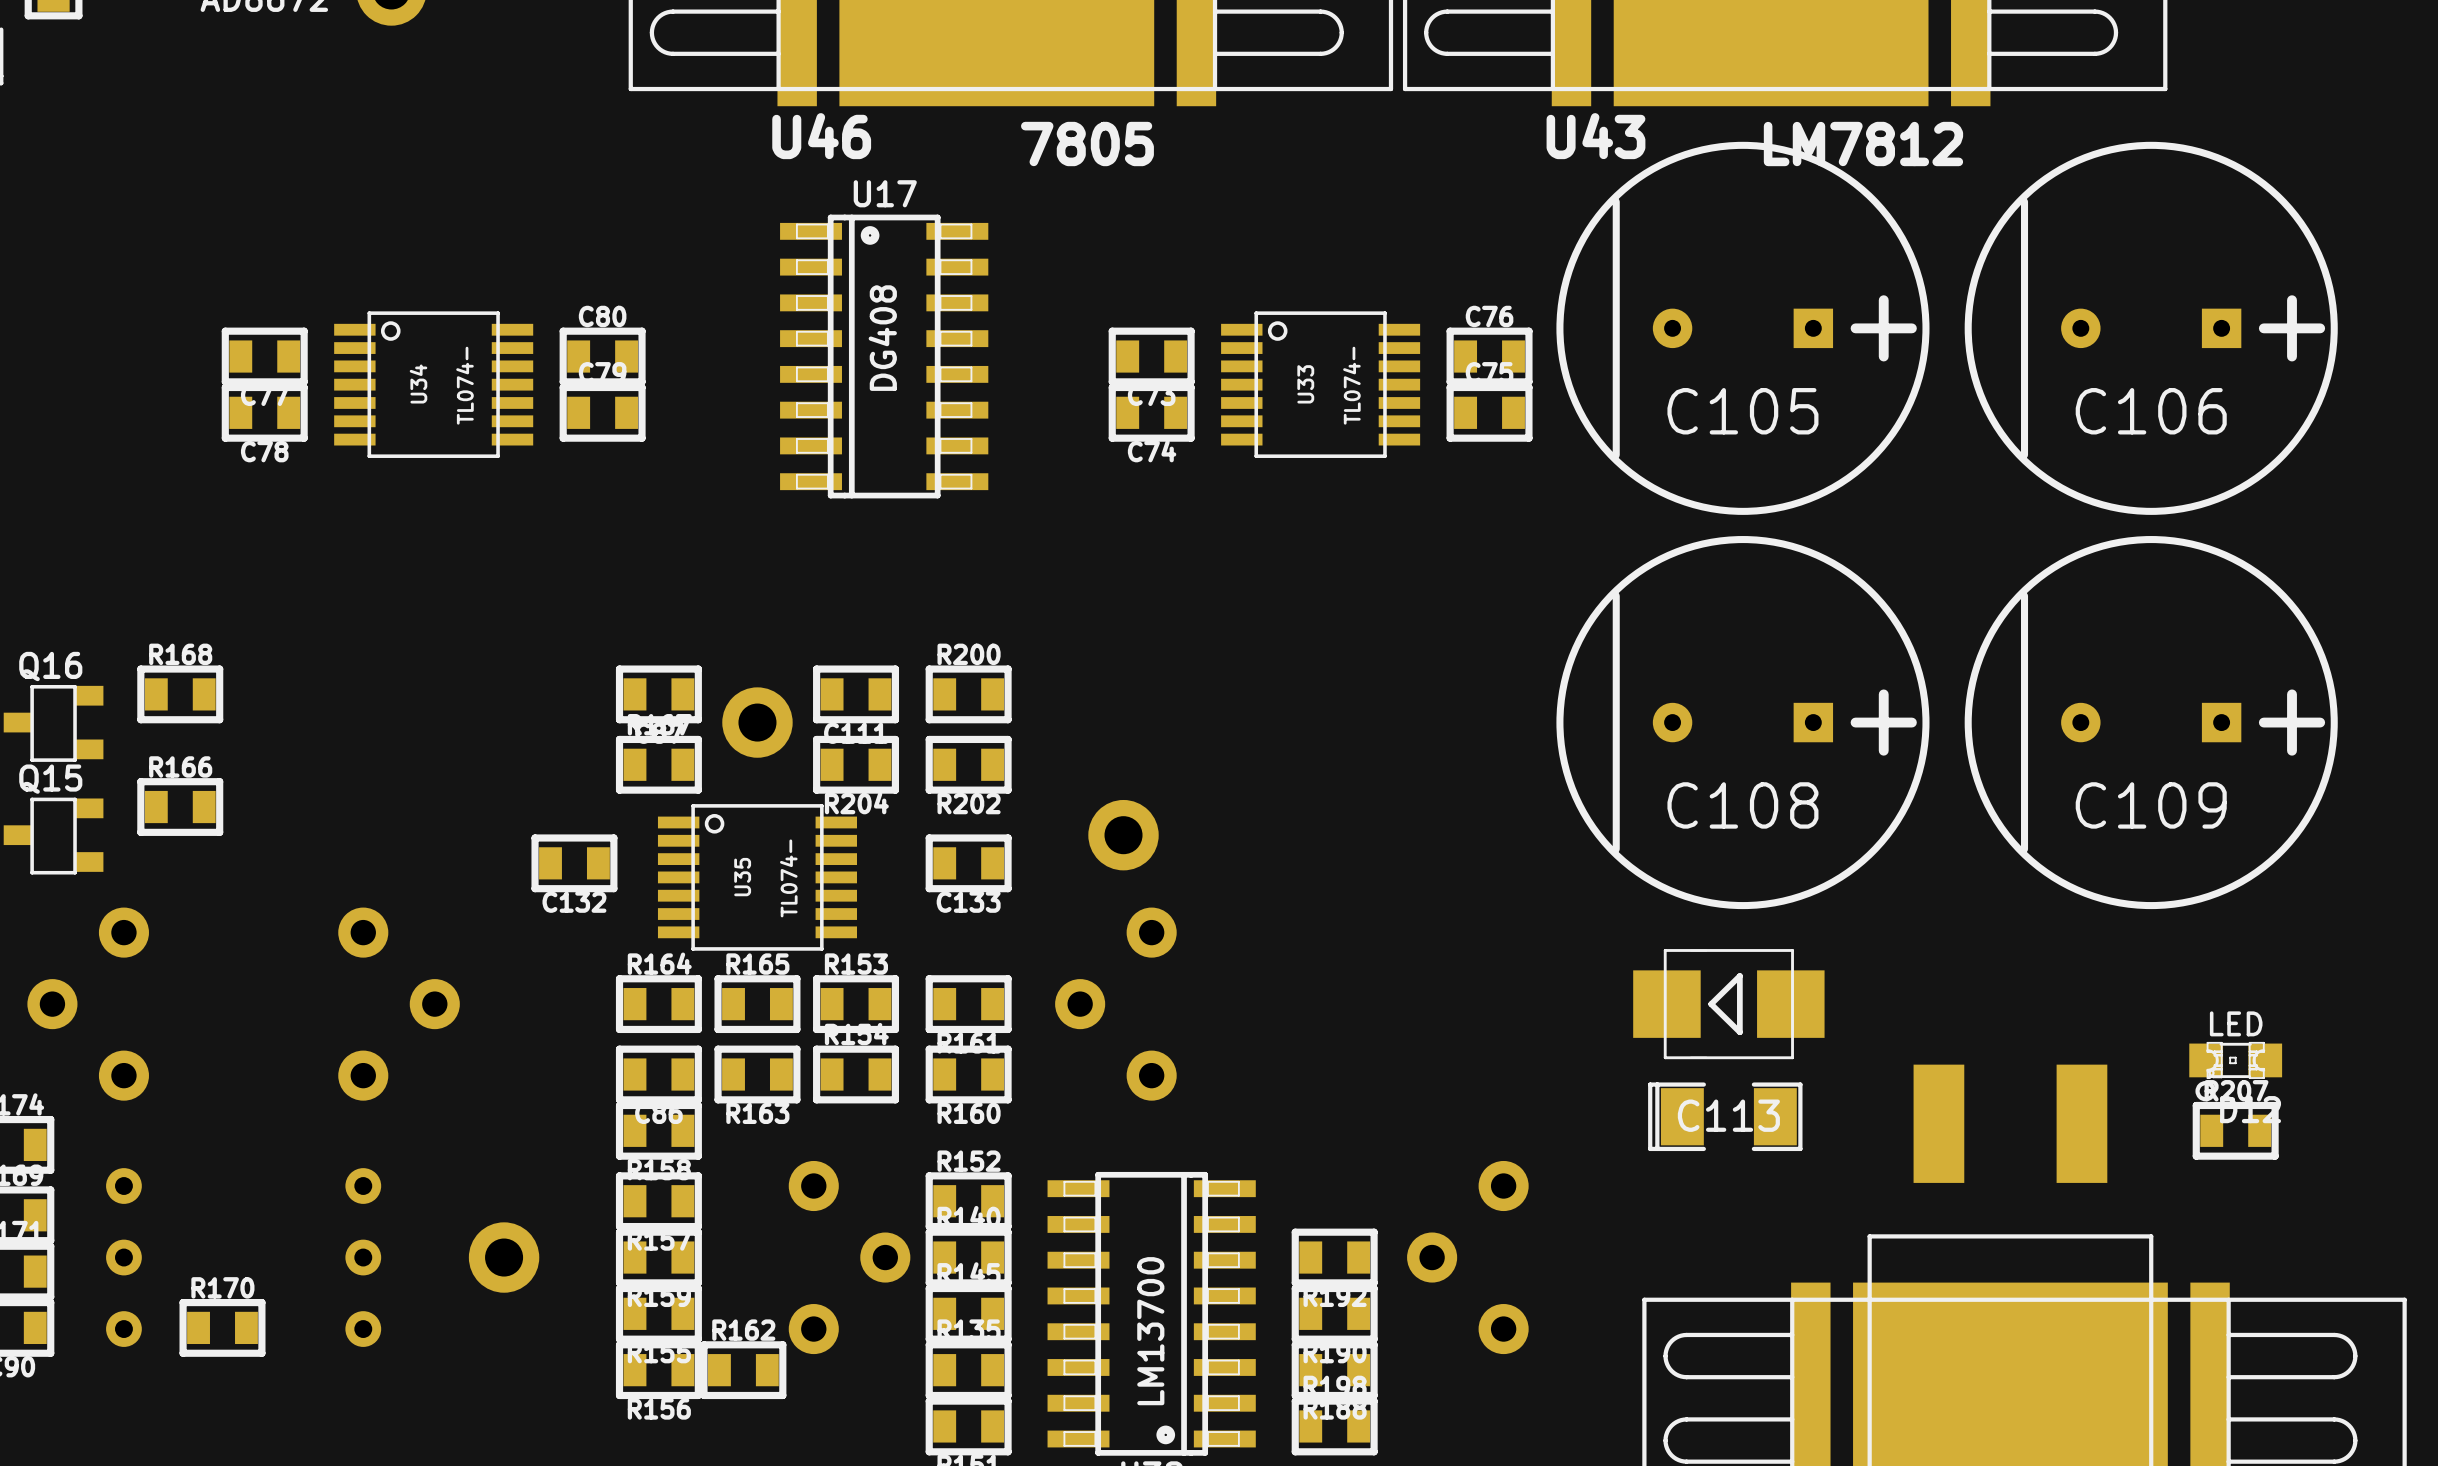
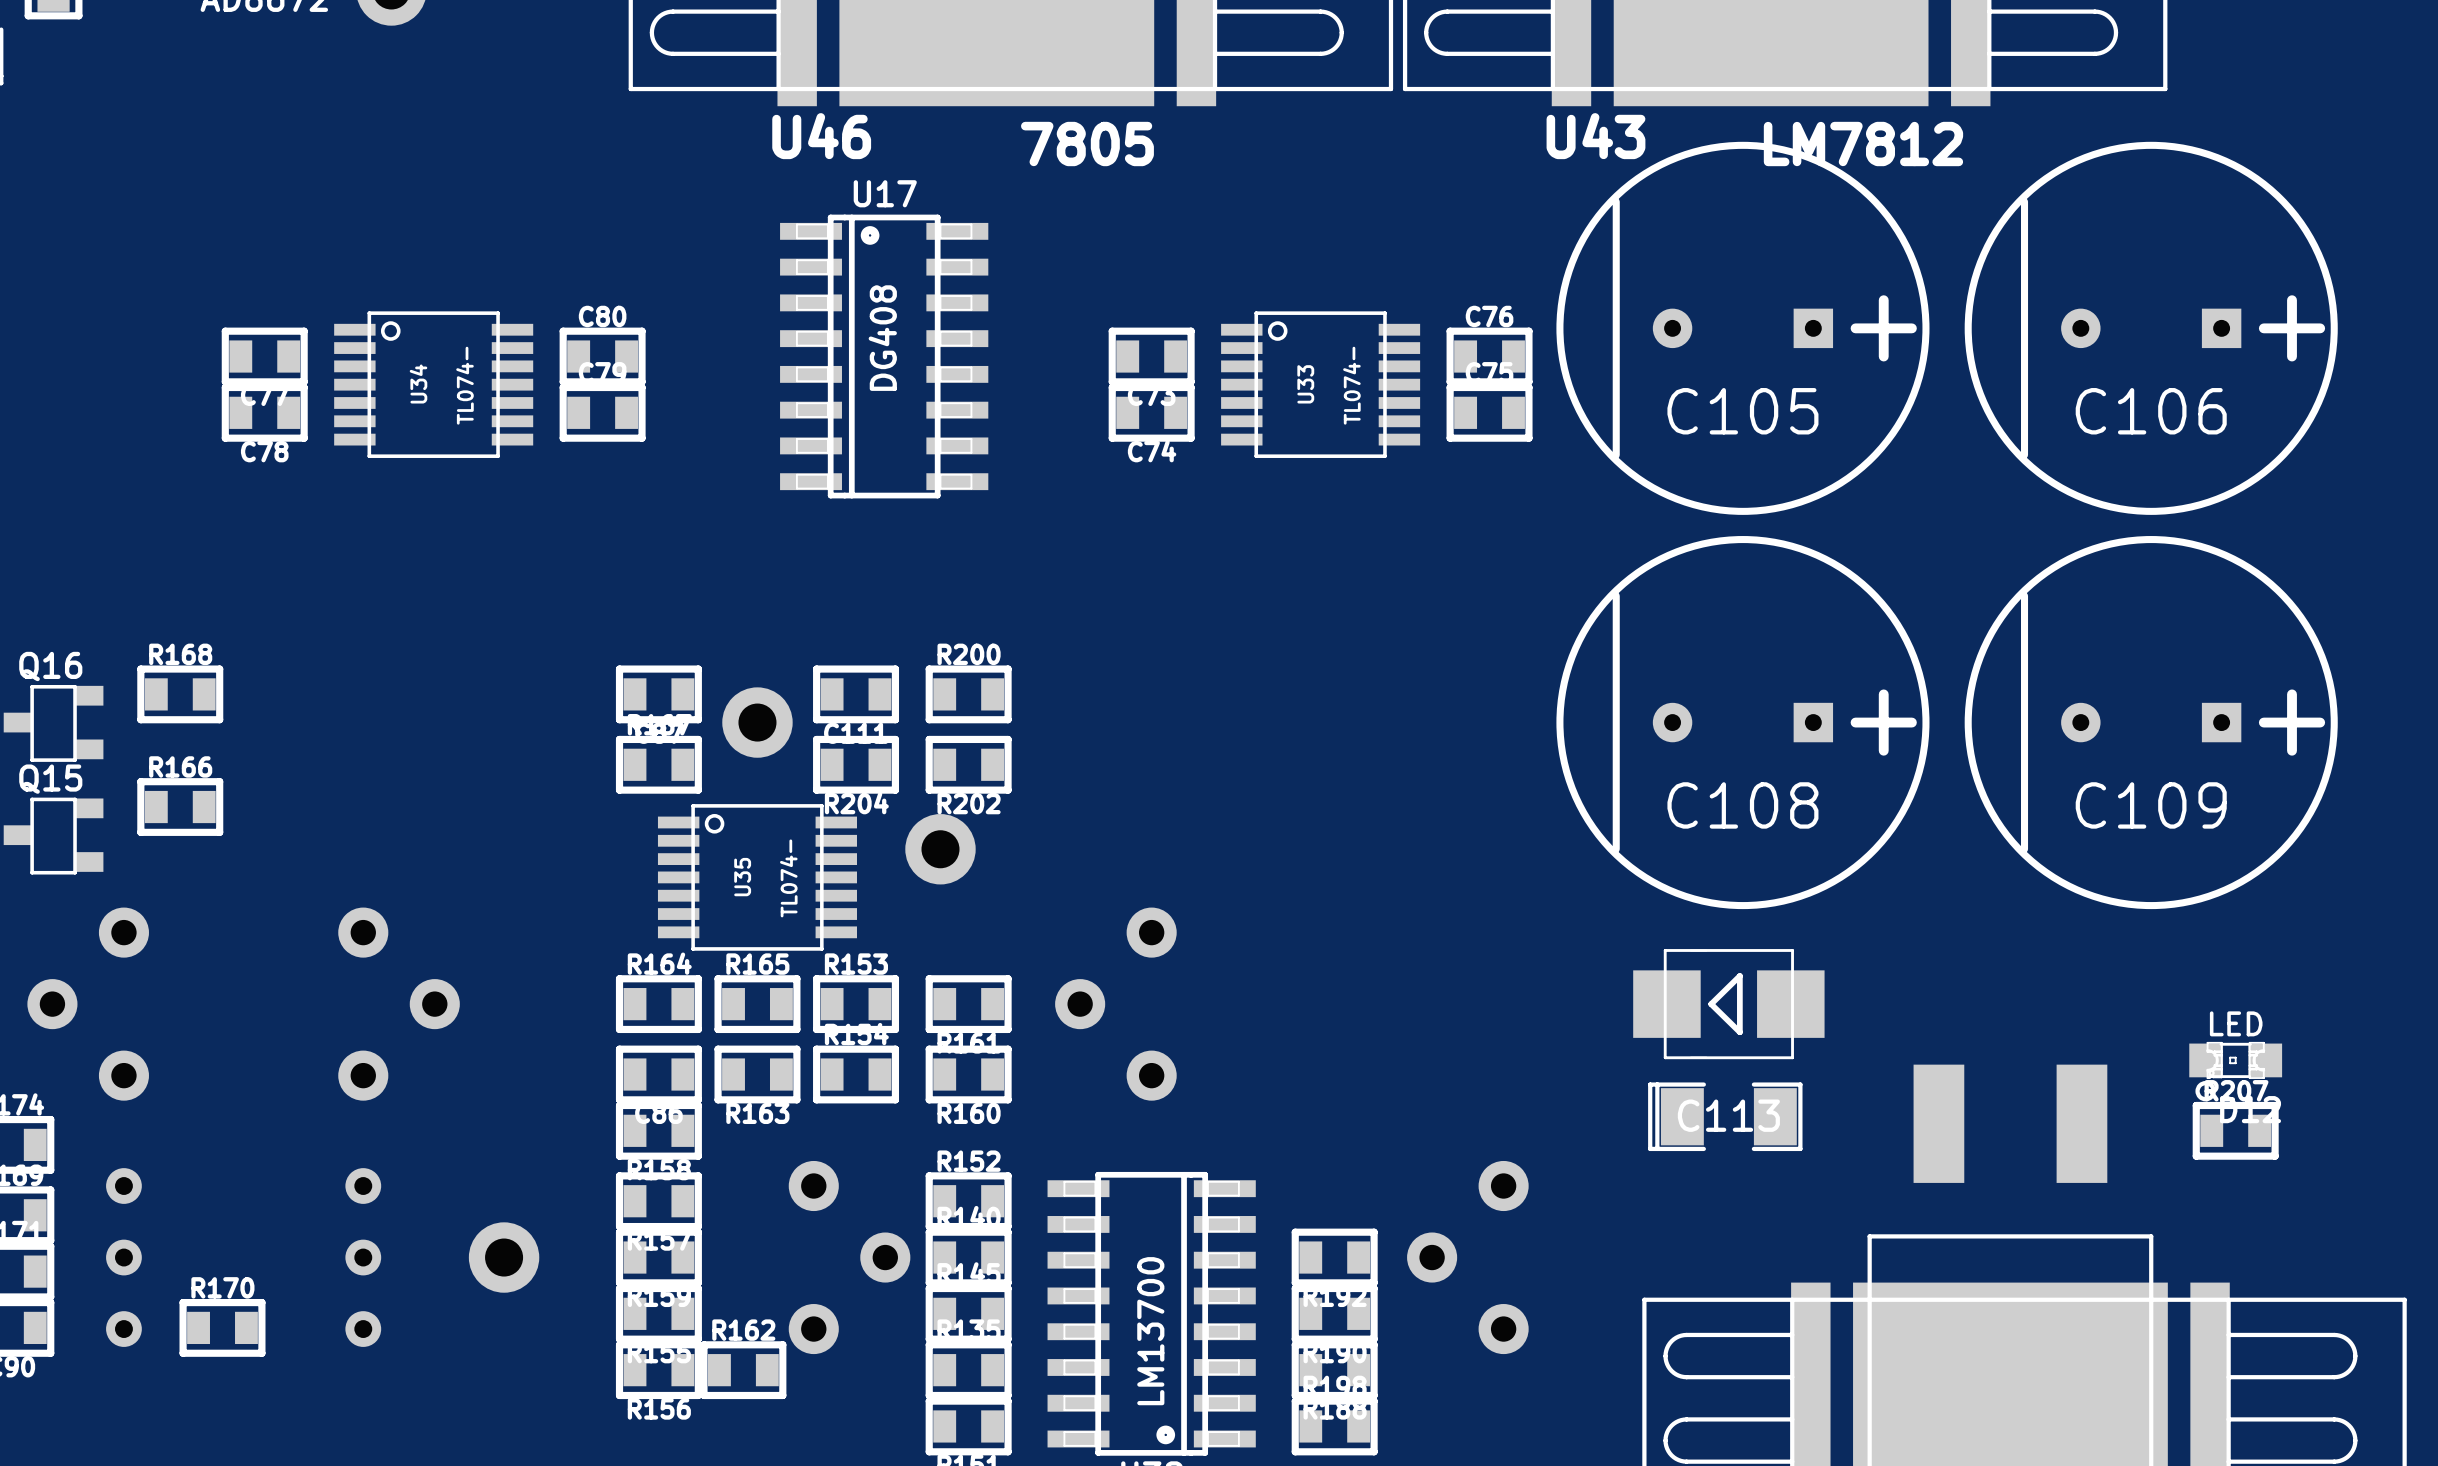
part position: (1123, 835) -> (940, 849)
C132: (574, 863) -> none
C133: (968, 863) -> none

